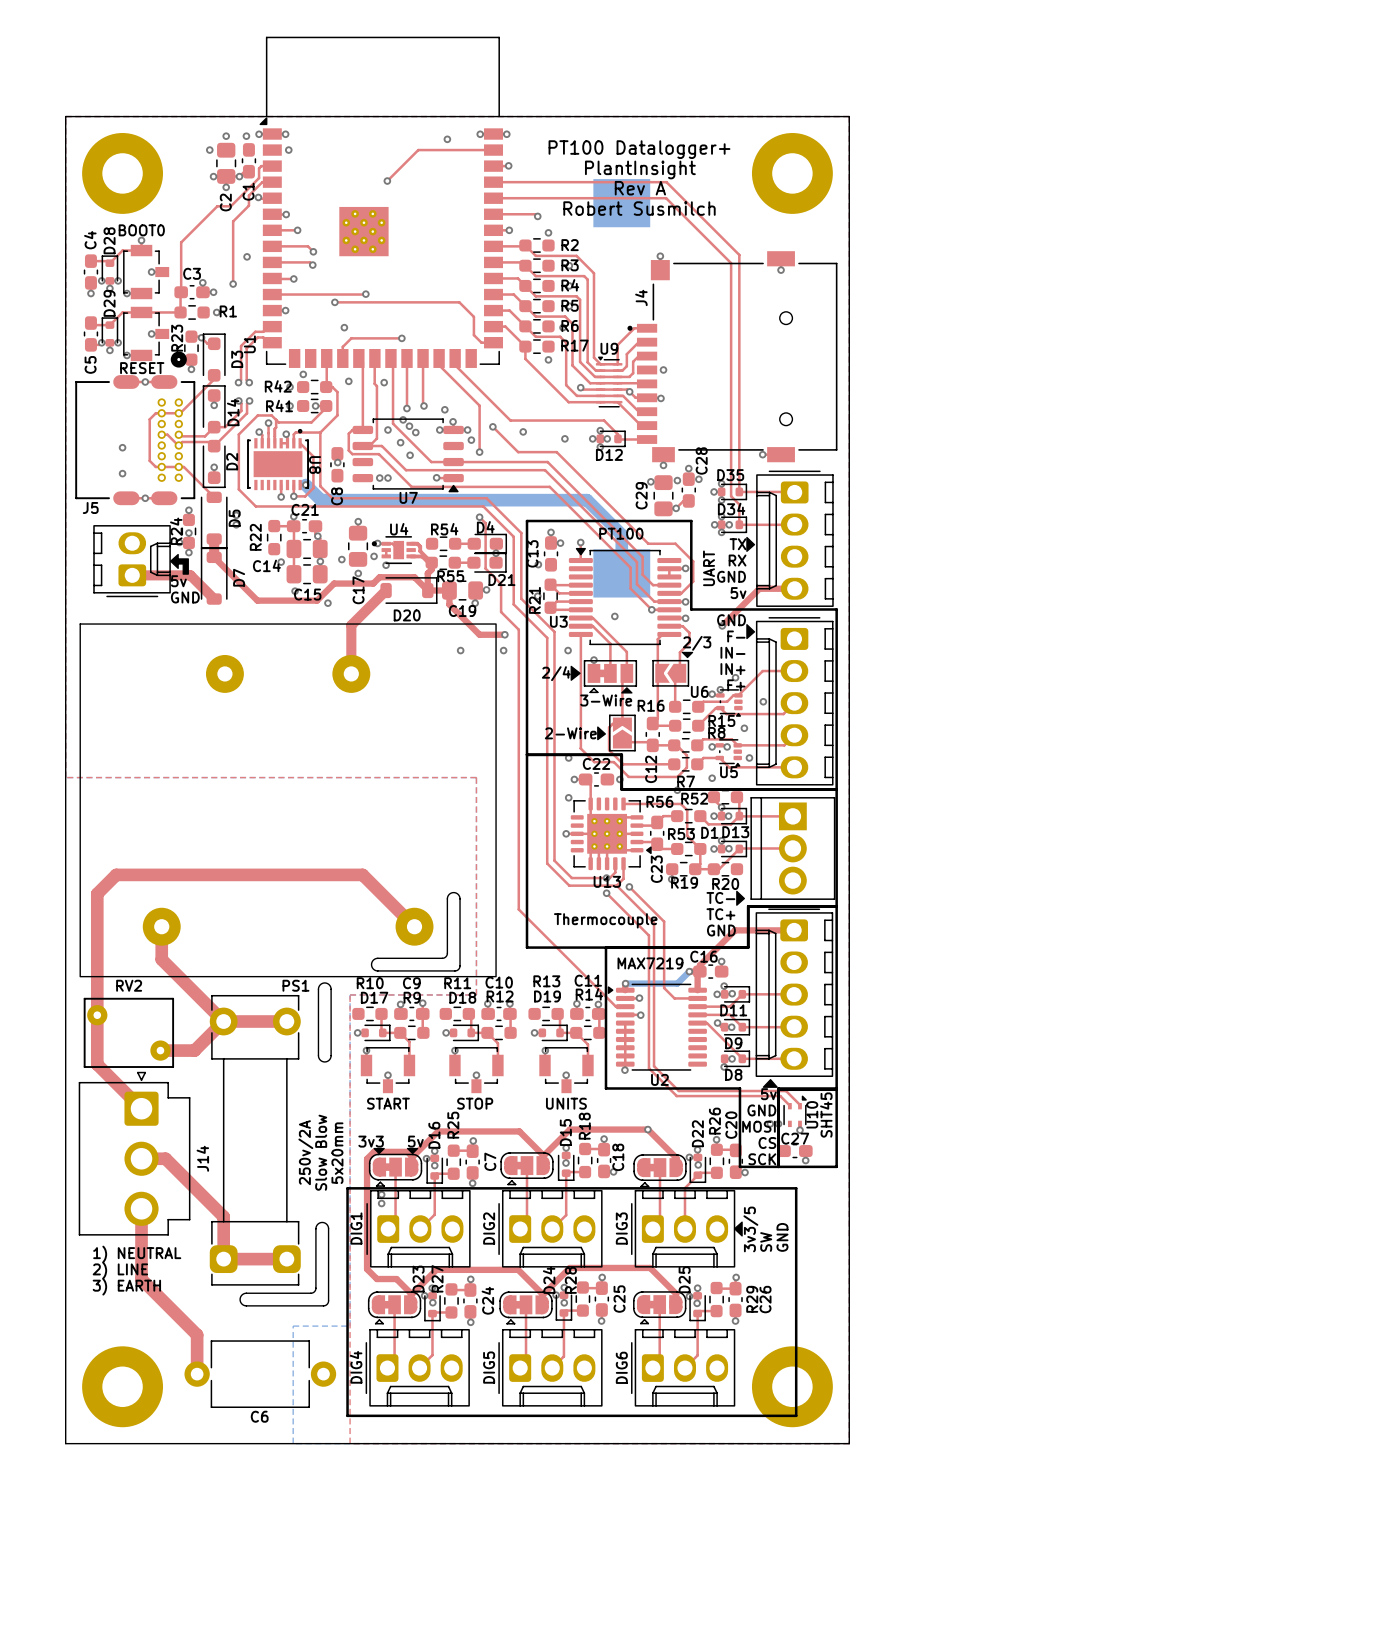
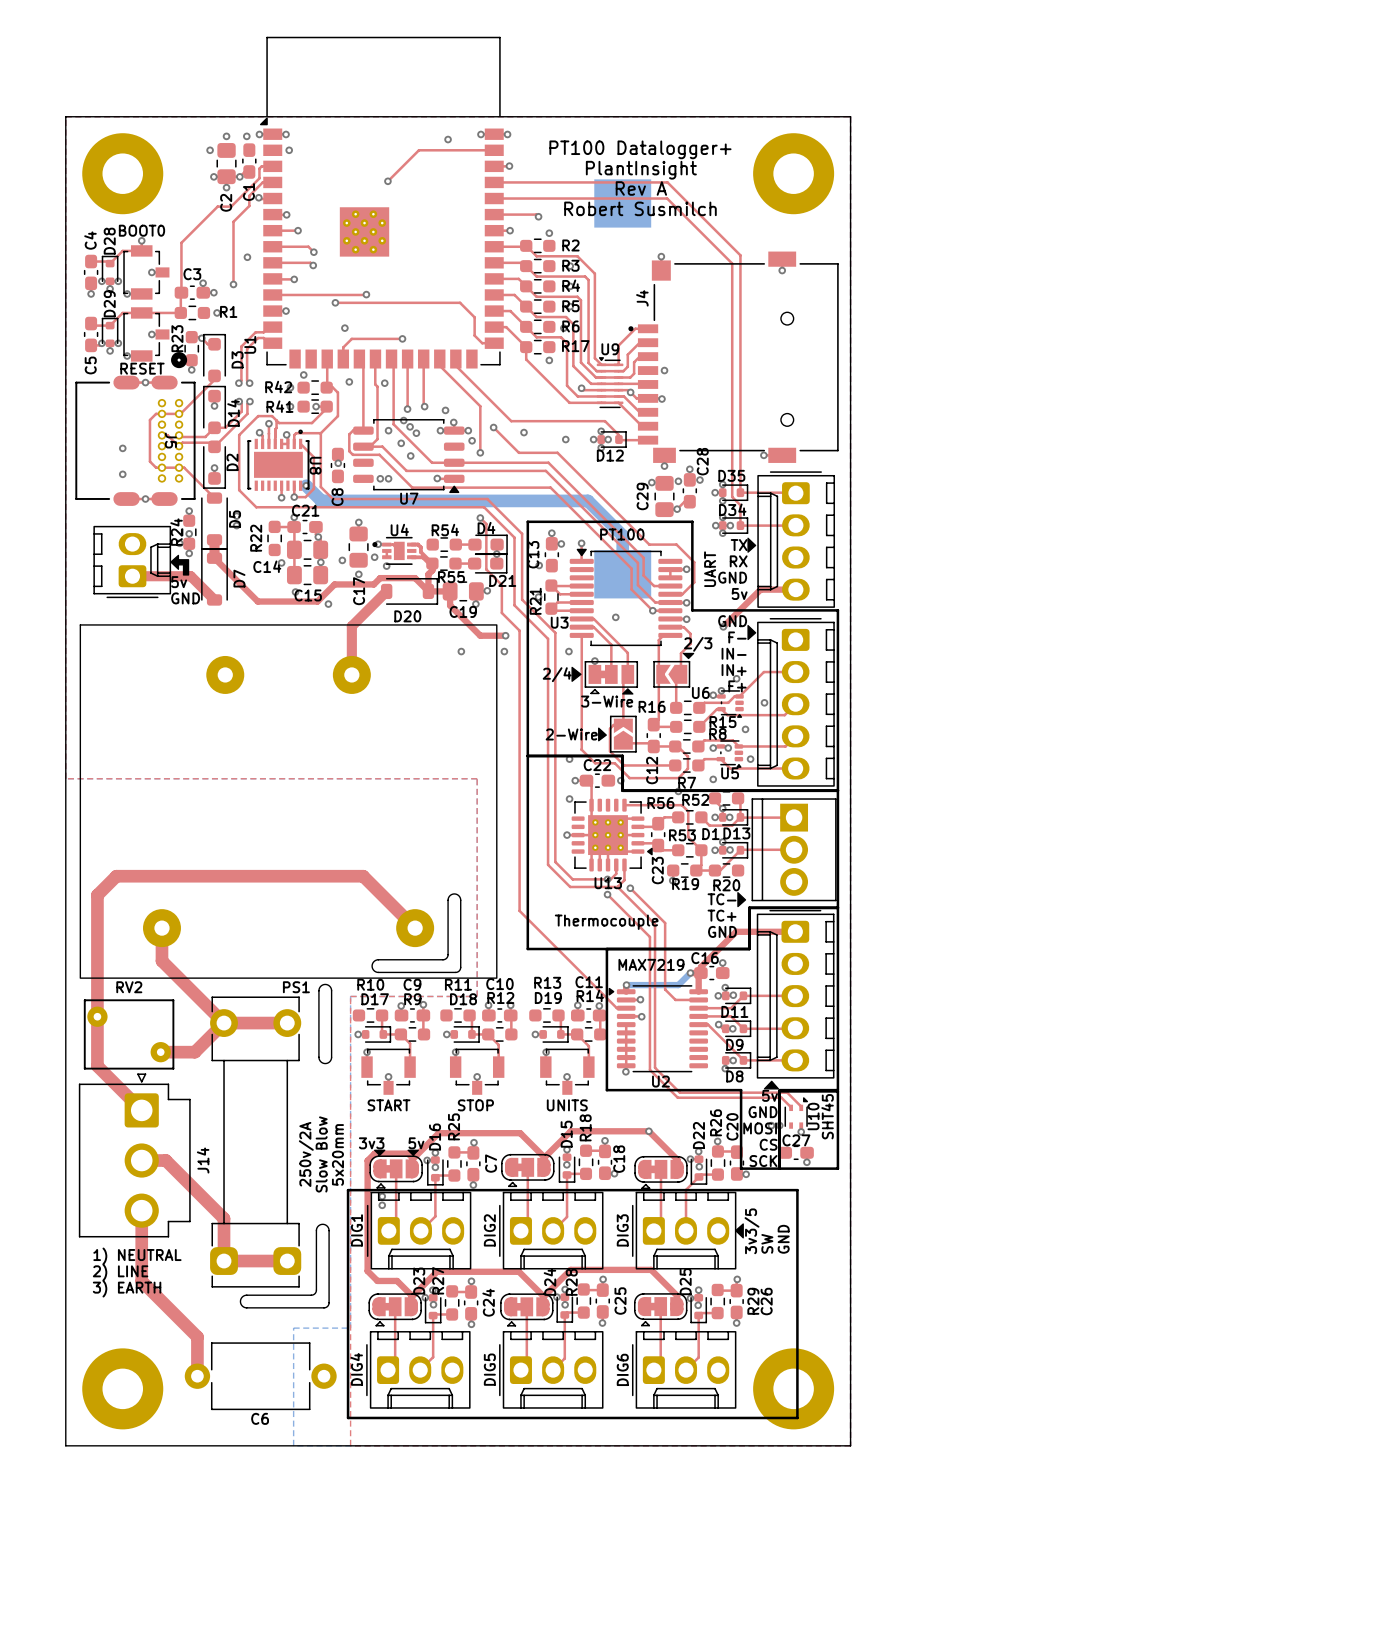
J5 name rotation: 0° (90, 507) -> 90° clockwise (170, 440)
J5 name position: J5 (90, 507) -> J5 (170, 440)

